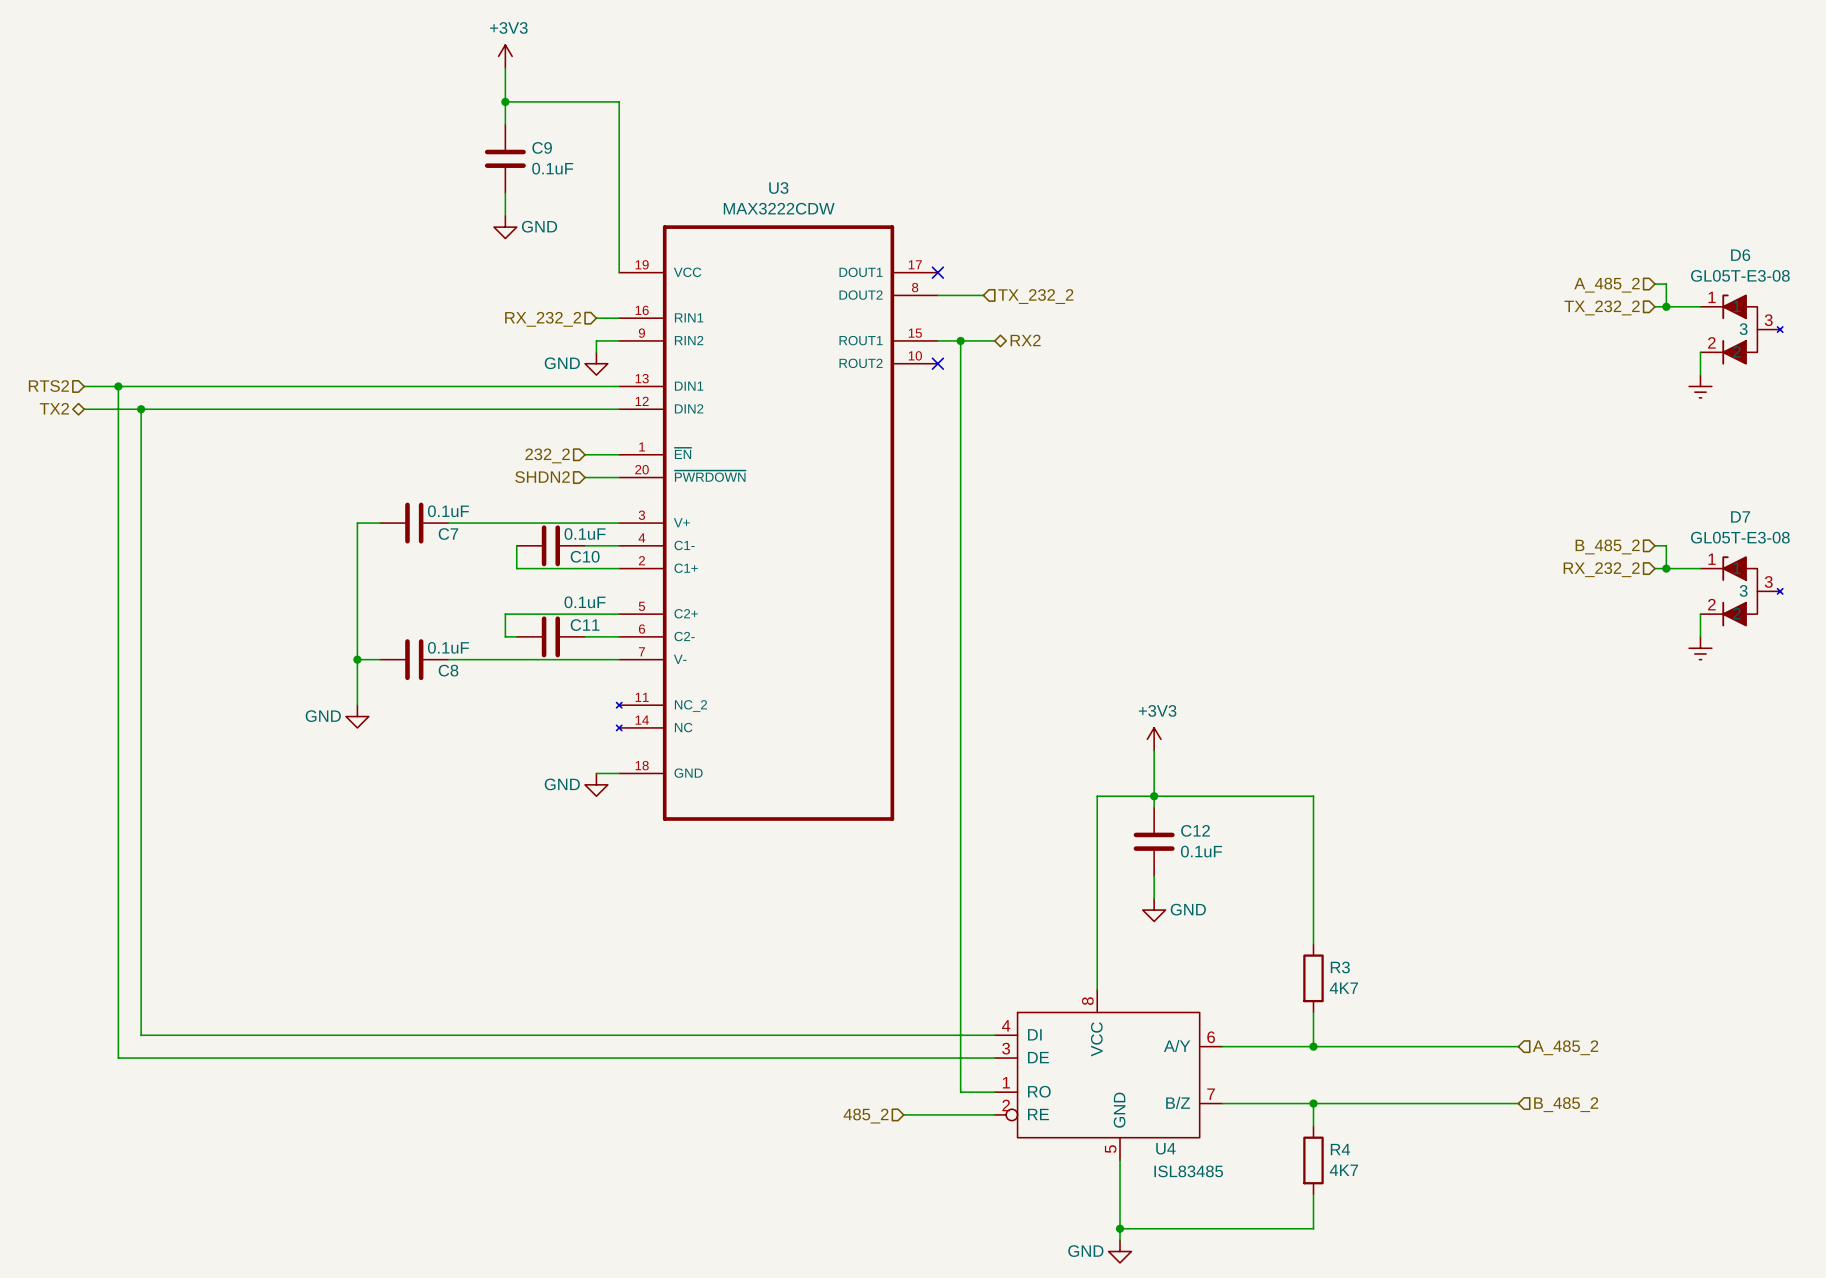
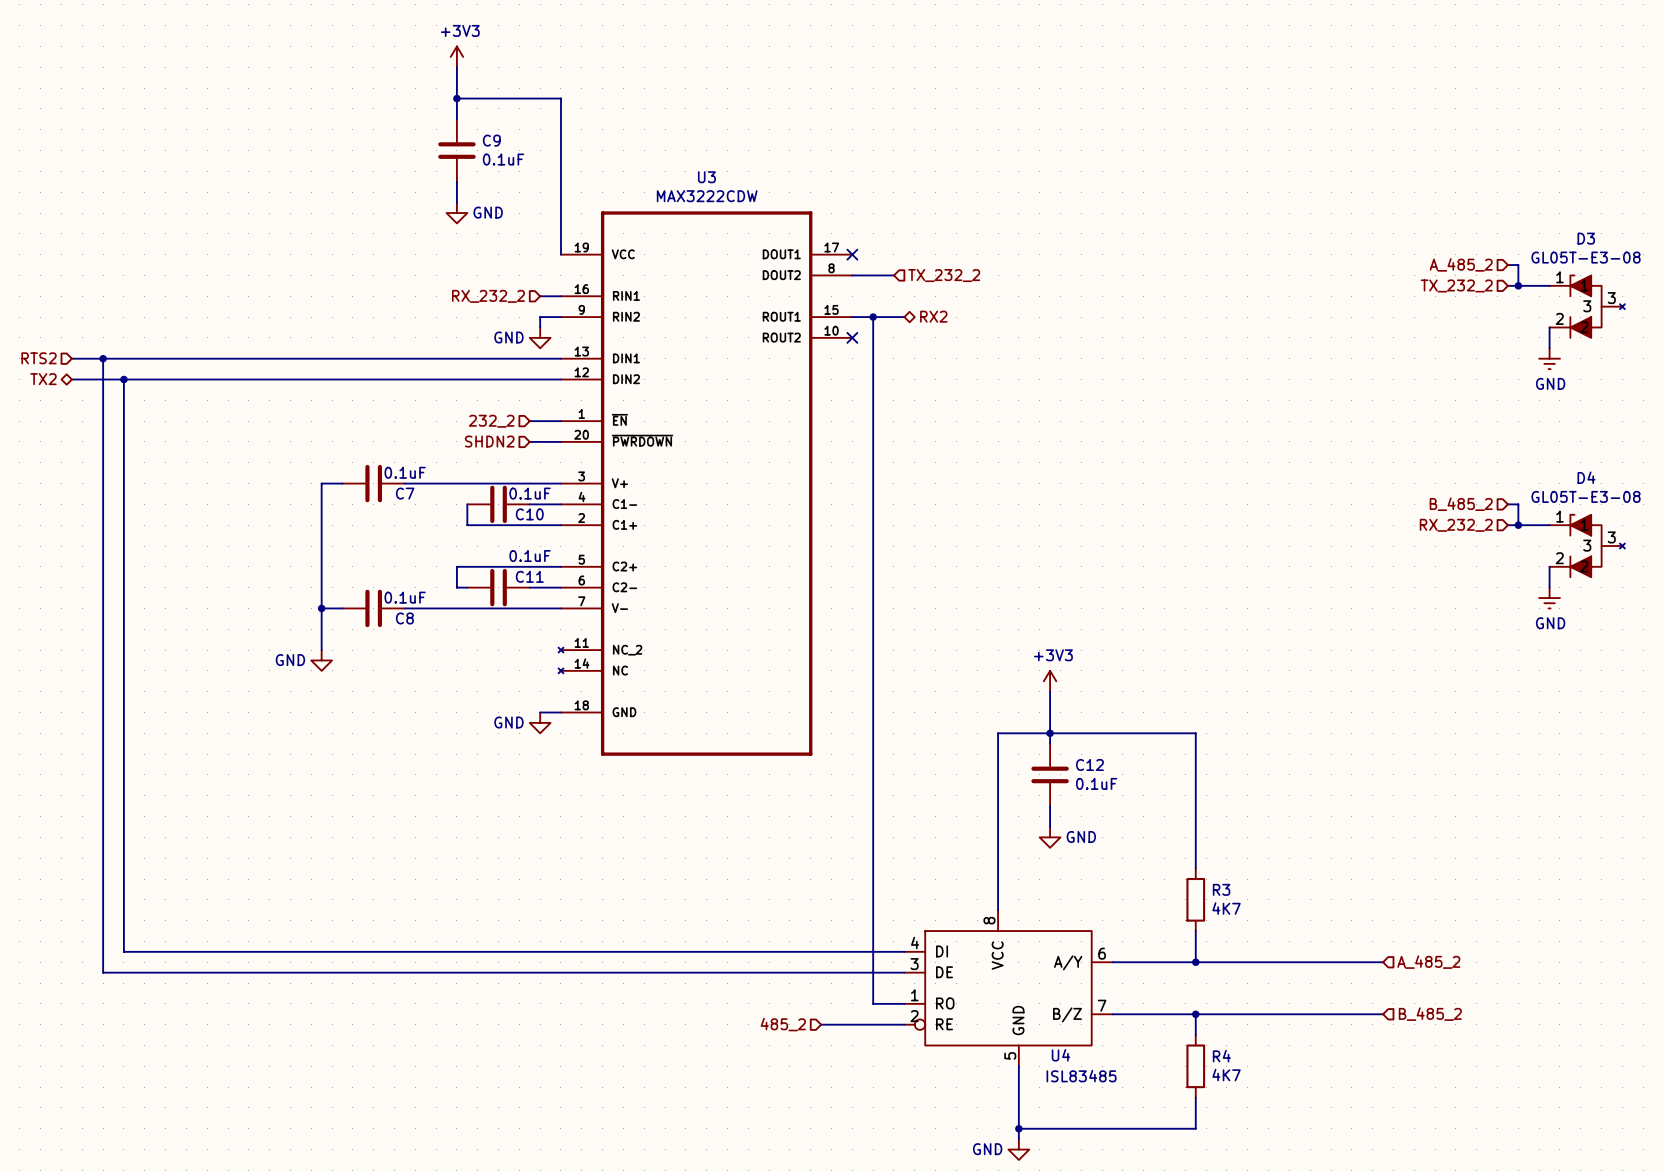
D6 name: D6 (1740, 255) -> D3 (1586, 238)
power symbol text: none -> GND (1550, 383)
D7 name: D7 (1740, 516) -> D4 (1586, 477)
power symbol text: none -> GND (1550, 623)

